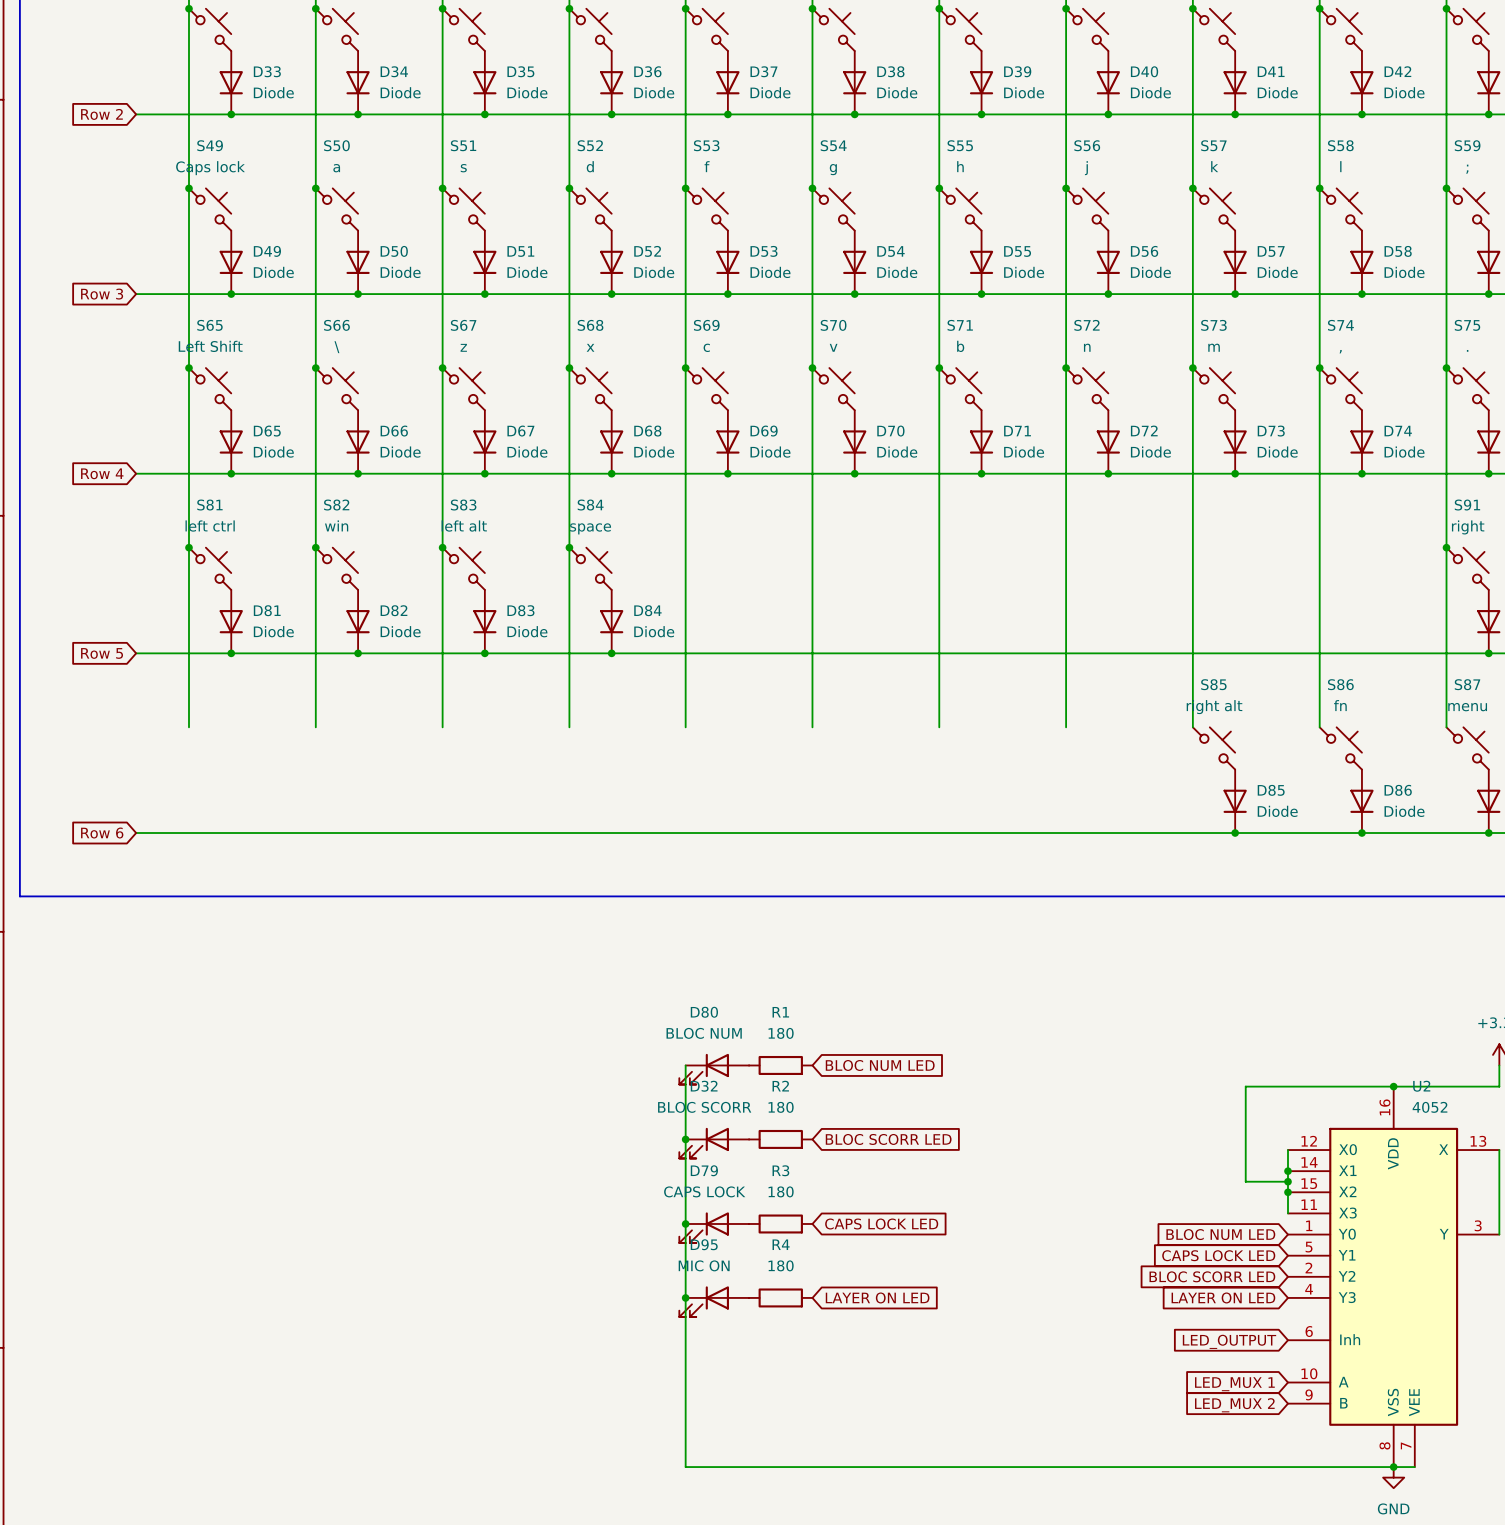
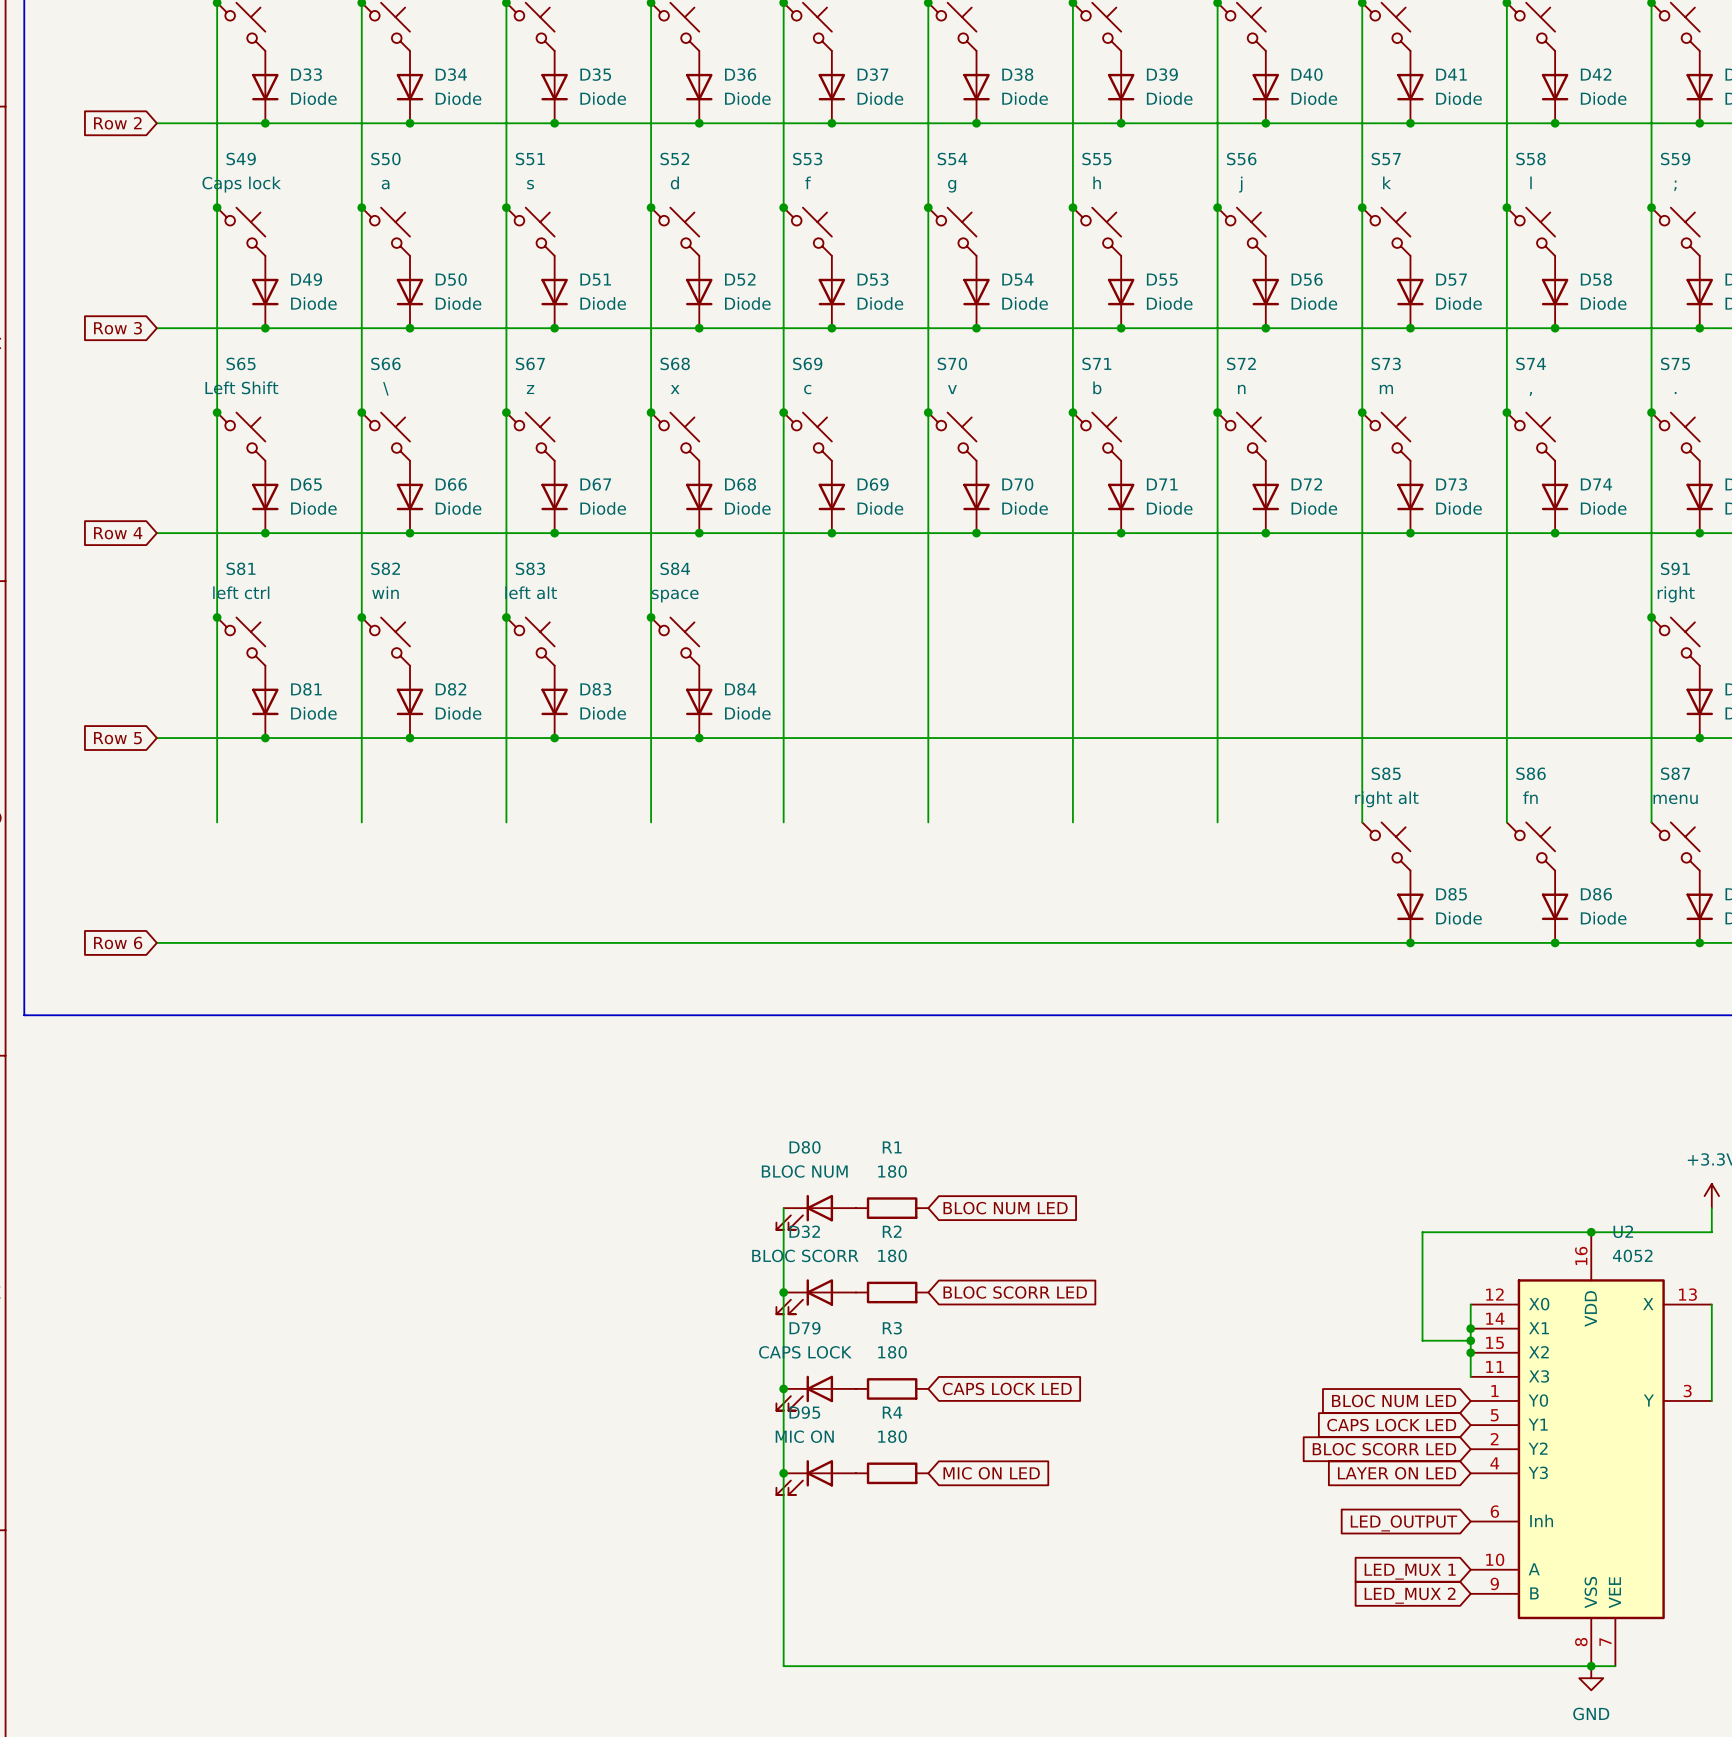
global label: LAYER ON LED (877, 1297) -> MIC ON LED (991, 1473)

